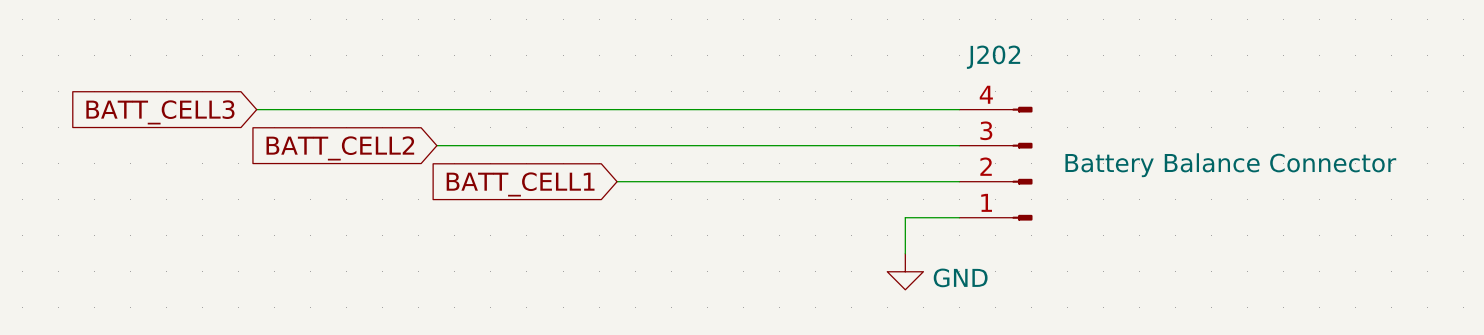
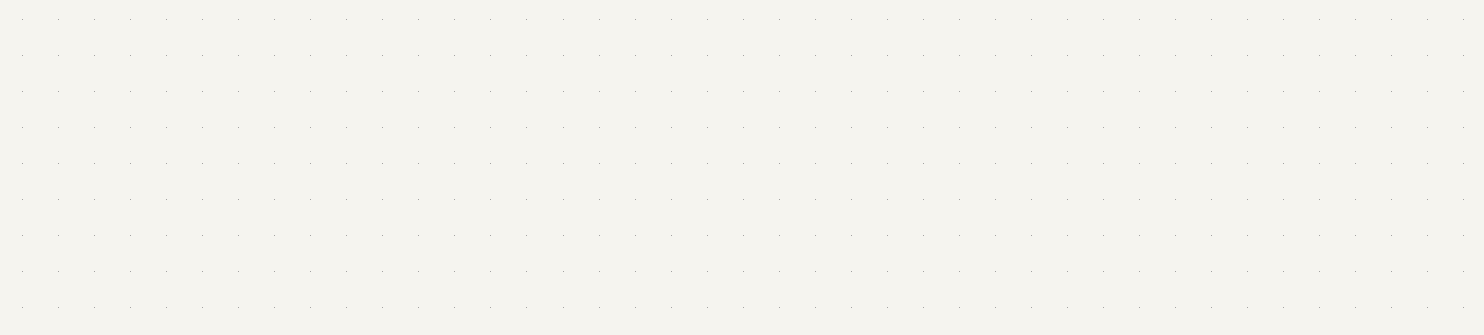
wire: (256, 109) (959, 109) -> none
global label: BATT_CELL3 (160, 112) -> none
wire: (436, 145) (959, 145) -> none
global label: BATT_CELL2 (340, 148) -> none
J202: Battery Balance Connector (995, 163) -> none
wire: (617, 181) (959, 181) -> none
global label: BATT_CELL1 (520, 184) -> none
wire: (959, 217) (905, 217) (905, 253) -> none
power symbol: GND (905, 271) -> none

